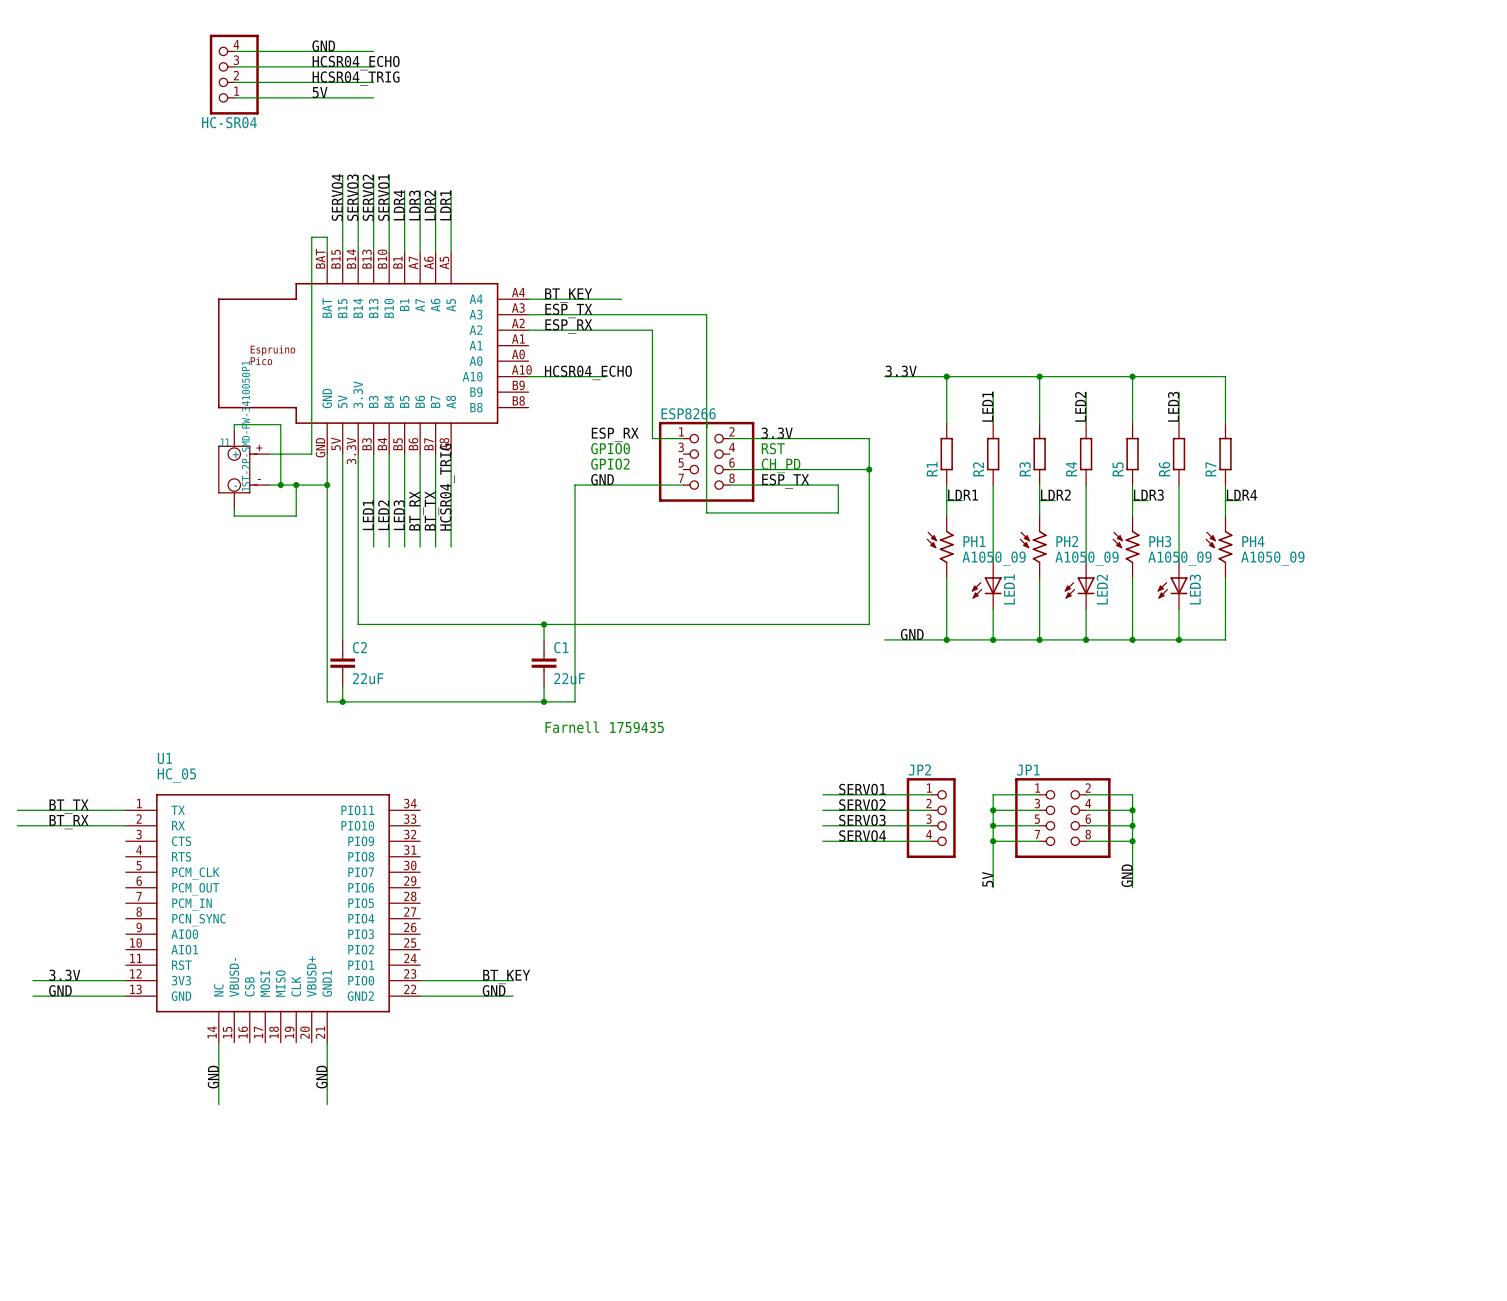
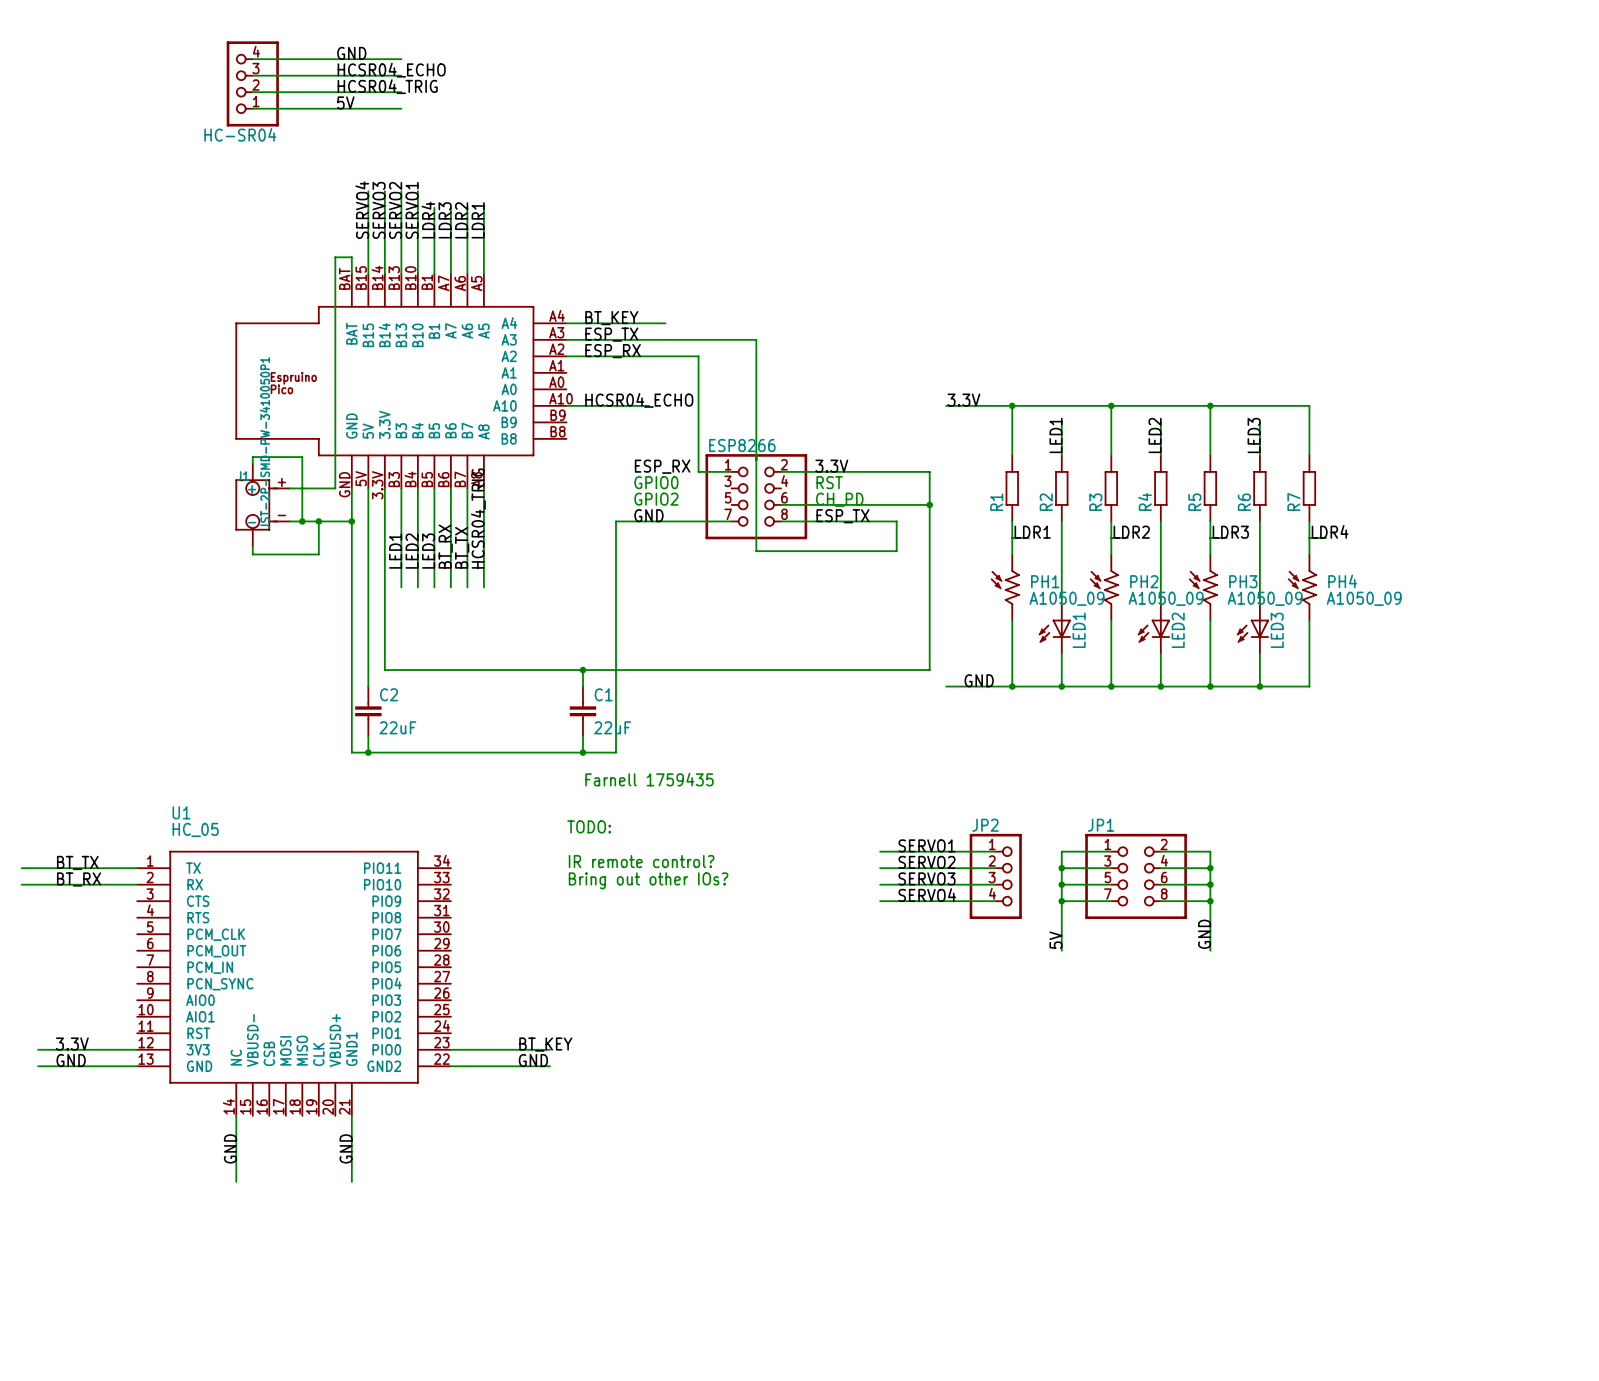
text: none -> TODO: (589, 826)
text: none -> IR remote control? (641, 861)
text: none -> Bring out other IOs? (648, 880)

